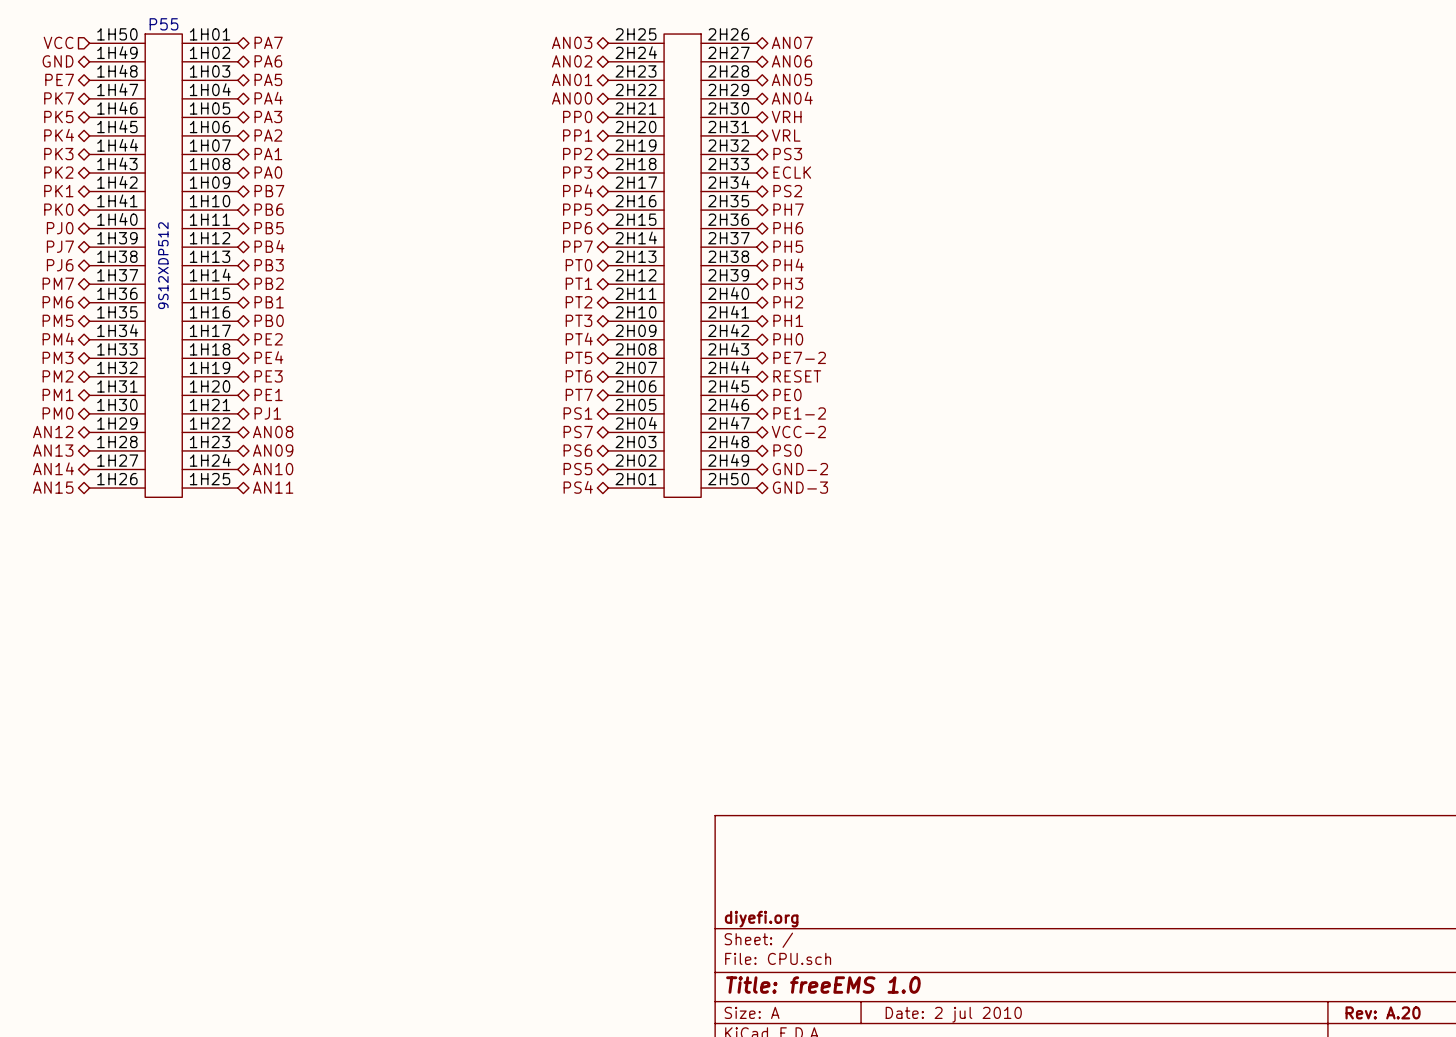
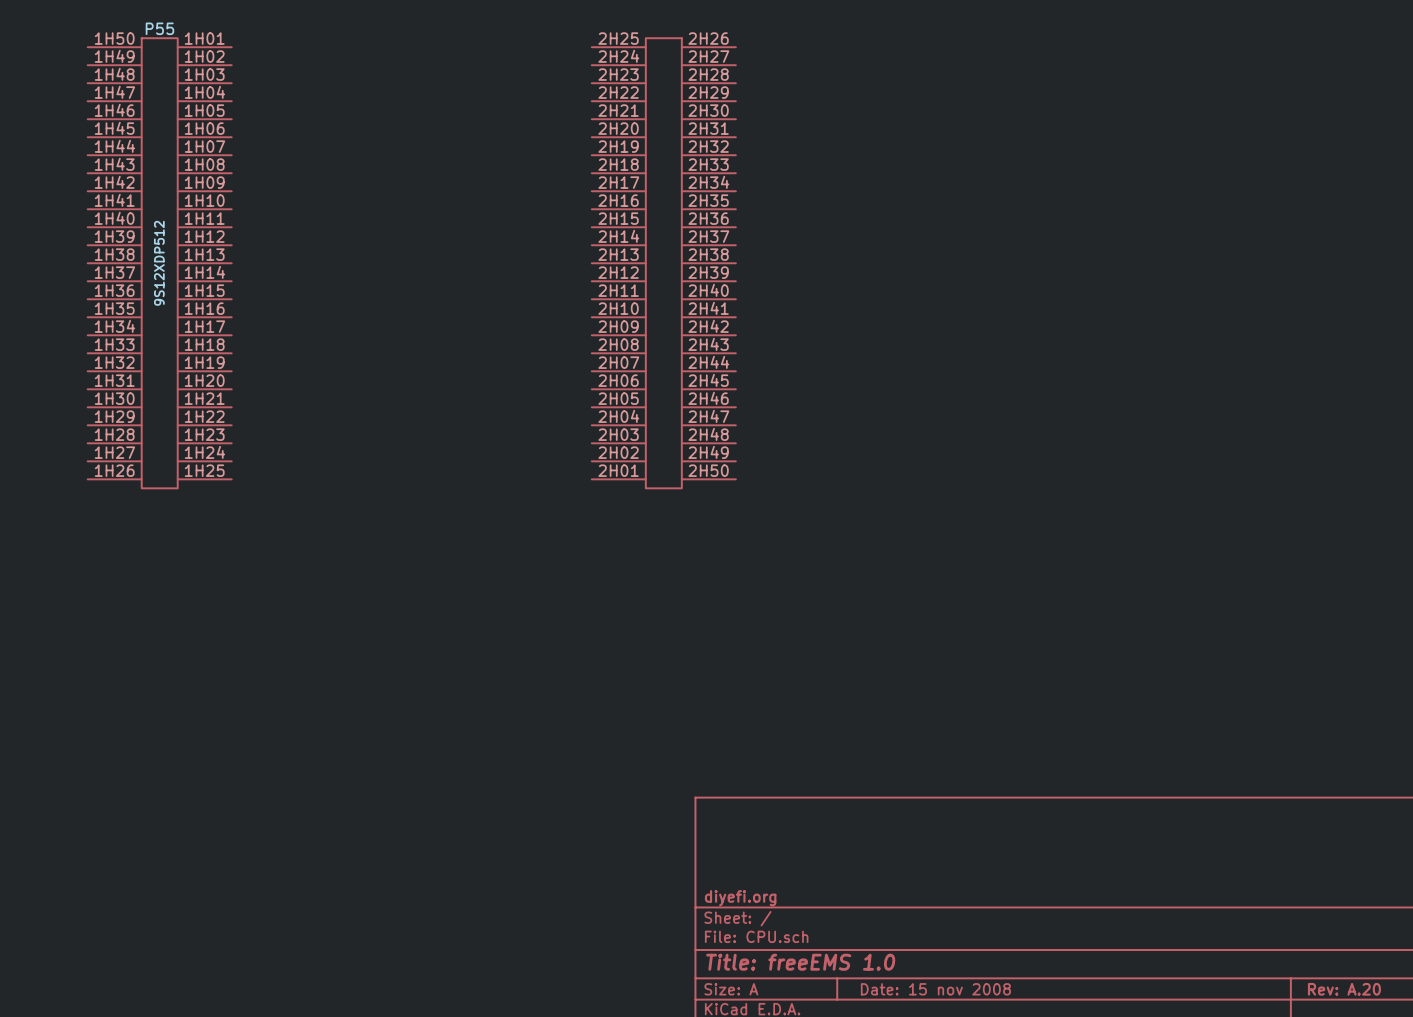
hierarchical label: VCC (58, 42) -> none
hierarchical label: PA7 (268, 42) -> none
hierarchical label: AN03 (572, 42) -> none
hierarchical label: AN07 (792, 42) -> none
hierarchical label: GND (58, 61) -> none
hierarchical label: PA6 (268, 61) -> none
hierarchical label: AN02 (572, 61) -> none
hierarchical label: AN06 (791, 61) -> none
hierarchical label: PE7 (59, 79) -> none
hierarchical label: PA5 (268, 79) -> none
hierarchical label: AN01 (572, 79) -> none
hierarchical label: AN05 (791, 79) -> none
hierarchical label: PK7 (59, 98) -> none
hierarchical label: PA4 (268, 98) -> none
hierarchical label: AN00 (572, 98) -> none
hierarchical label: AN04 (792, 98) -> none
hierarchical label: PK5 (58, 116) -> none
hierarchical label: PA3 (268, 116) -> none
hierarchical label: PP0 (577, 116) -> none
hierarchical label: VRH (786, 116) -> none
hierarchical label: PK4 (59, 135) -> none
hierarchical label: PA2 (268, 135) -> none
hierarchical label: PP1 (577, 135) -> none
hierarchical label: VRL (786, 135) -> none
hierarchical label: PK3 (58, 154) -> none
hierarchical label: PA1 (268, 154) -> none
hierarchical label: PP2 (577, 154) -> none
hierarchical label: PS3 (787, 154) -> none
hierarchical label: PK2 (58, 172) -> none
hierarchical label: PA0 (268, 172) -> none
hierarchical label: PP3 (577, 172) -> none
hierarchical label: ECLK (792, 172) -> none
hierarchical label: PP4 (577, 190) -> none
hierarchical label: PK1 (58, 191) -> none
hierarchical label: PB7 (269, 191) -> none
hierarchical label: PS2 (787, 191) -> none
hierarchical label: PK0 (58, 209) -> none
hierarchical label: PB6 (269, 209) -> none
hierarchical label: PP5 (577, 209) -> none
hierarchical label: PH7 (788, 209) -> none
hierarchical label: PJ0 (60, 228) -> none
hierarchical label: PB5 (269, 228) -> none
hierarchical label: PP6 (577, 228) -> none
hierarchical label: PH6 (788, 228) -> none
hierarchical label: PJ7 (60, 246) -> none
hierarchical label: PB4 (269, 246) -> none
hierarchical label: PP7 (577, 246) -> none
hierarchical label: PH5 (788, 246) -> none
hierarchical label: PH4 (788, 264) -> none
hierarchical label: PJ6 (60, 265) -> none
hierarchical label: PB3 (269, 265) -> none
hierarchical label: PT0 (579, 265) -> none
hierarchical label: PM7 (58, 283) -> none
hierarchical label: PB2 (269, 283) -> none
hierarchical label: PT1 (579, 283) -> none
hierarchical label: PH3 (788, 283) -> none
hierarchical label: PM6 (58, 302) -> none
hierarchical label: PB1 (269, 302) -> none
hierarchical label: PT2 (579, 302) -> none
hierarchical label: PH2 (788, 302) -> none
hierarchical label: PM5 (58, 320) -> none
hierarchical label: PB0 (269, 320) -> none
hierarchical label: PT3 (579, 320) -> none
hierarchical label: PH1 (788, 320) -> none
hierarchical label: PM4 (58, 339) -> none
hierarchical label: PE2 (268, 339) -> none
hierarchical label: PT4 (579, 339) -> none
hierarchical label: PH0 (788, 339) -> none
hierarchical label: PM3 (58, 357) -> none
hierarchical label: PE4 (268, 357) -> none
hierarchical label: PT5 (579, 357) -> none
hierarchical label: PE7-2 (799, 357) -> none
hierarchical label: PM2 (58, 376) -> none
hierarchical label: PE3 (268, 376) -> none
hierarchical label: PT6 (579, 376) -> none
hierarchical label: RESET (797, 376) -> none
hierarchical label: PM1 (58, 394) -> none
hierarchical label: PE1 (268, 394) -> none
hierarchical label: PT7 (579, 394) -> none
hierarchical label: PE0 (787, 394) -> none
hierarchical label: PM0 (58, 413) -> none
hierarchical label: PJ1 (267, 413) -> none
hierarchical label: PS1 (577, 413) -> none
hierarchical label: PE1-2 (799, 413) -> none
hierarchical label: AN12 (53, 432) -> none
hierarchical label: AN08 (273, 432) -> none
hierarchical label: PS7 (578, 432) -> none
hierarchical label: VCC-2 (798, 432) -> none
hierarchical label: AN13 (53, 450) -> none
hierarchical label: AN09 (273, 450) -> none
hierarchical label: PS6 (577, 450) -> none
hierarchical label: PS0 (787, 450) -> none
hierarchical label: AN14 (53, 468) -> none
hierarchical label: AN10 (273, 469) -> none
hierarchical label: PS5 (577, 469) -> none
hierarchical label: GND-2 (800, 469) -> none
hierarchical label: AN15 (53, 487) -> none
hierarchical label: AN11 (273, 487) -> none
hierarchical label: PS4 (578, 487) -> none
hierarchical label: GND-3 (800, 487) -> none
title block: Date: 2 jul 2010 (953, 1014) -> Date: 15 nov 2008 (935, 989)

